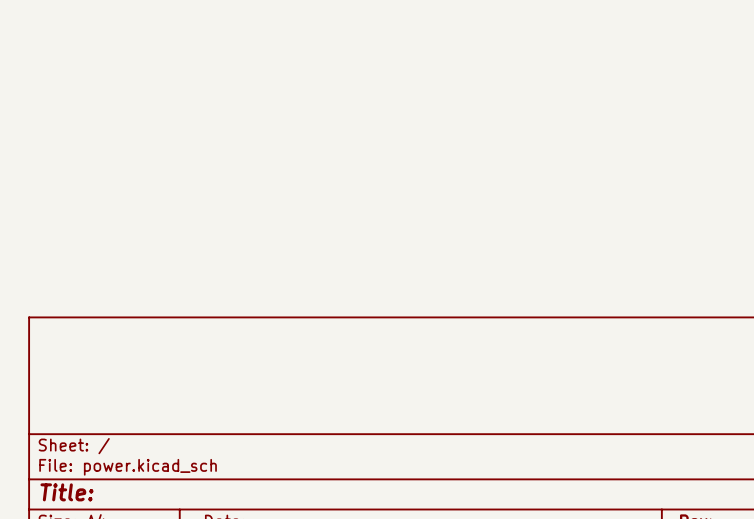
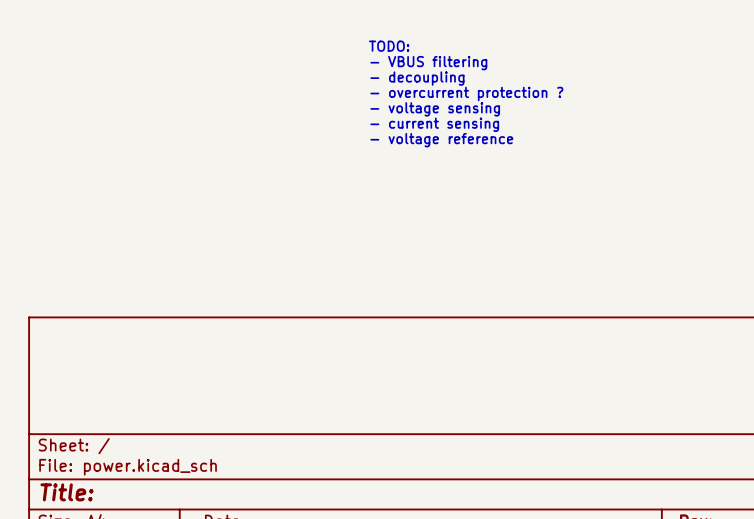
text: none -> TODO: (389, 46)
text: none -> - VBUS filtering (428, 63)
text: none -> - decoupling (417, 78)
text: none -> - overcurrent protection ? (466, 93)
text: none -> - voltage sensing (435, 109)
text: none -> - current sensing (434, 124)
text: none -> - voltage reference (441, 140)

